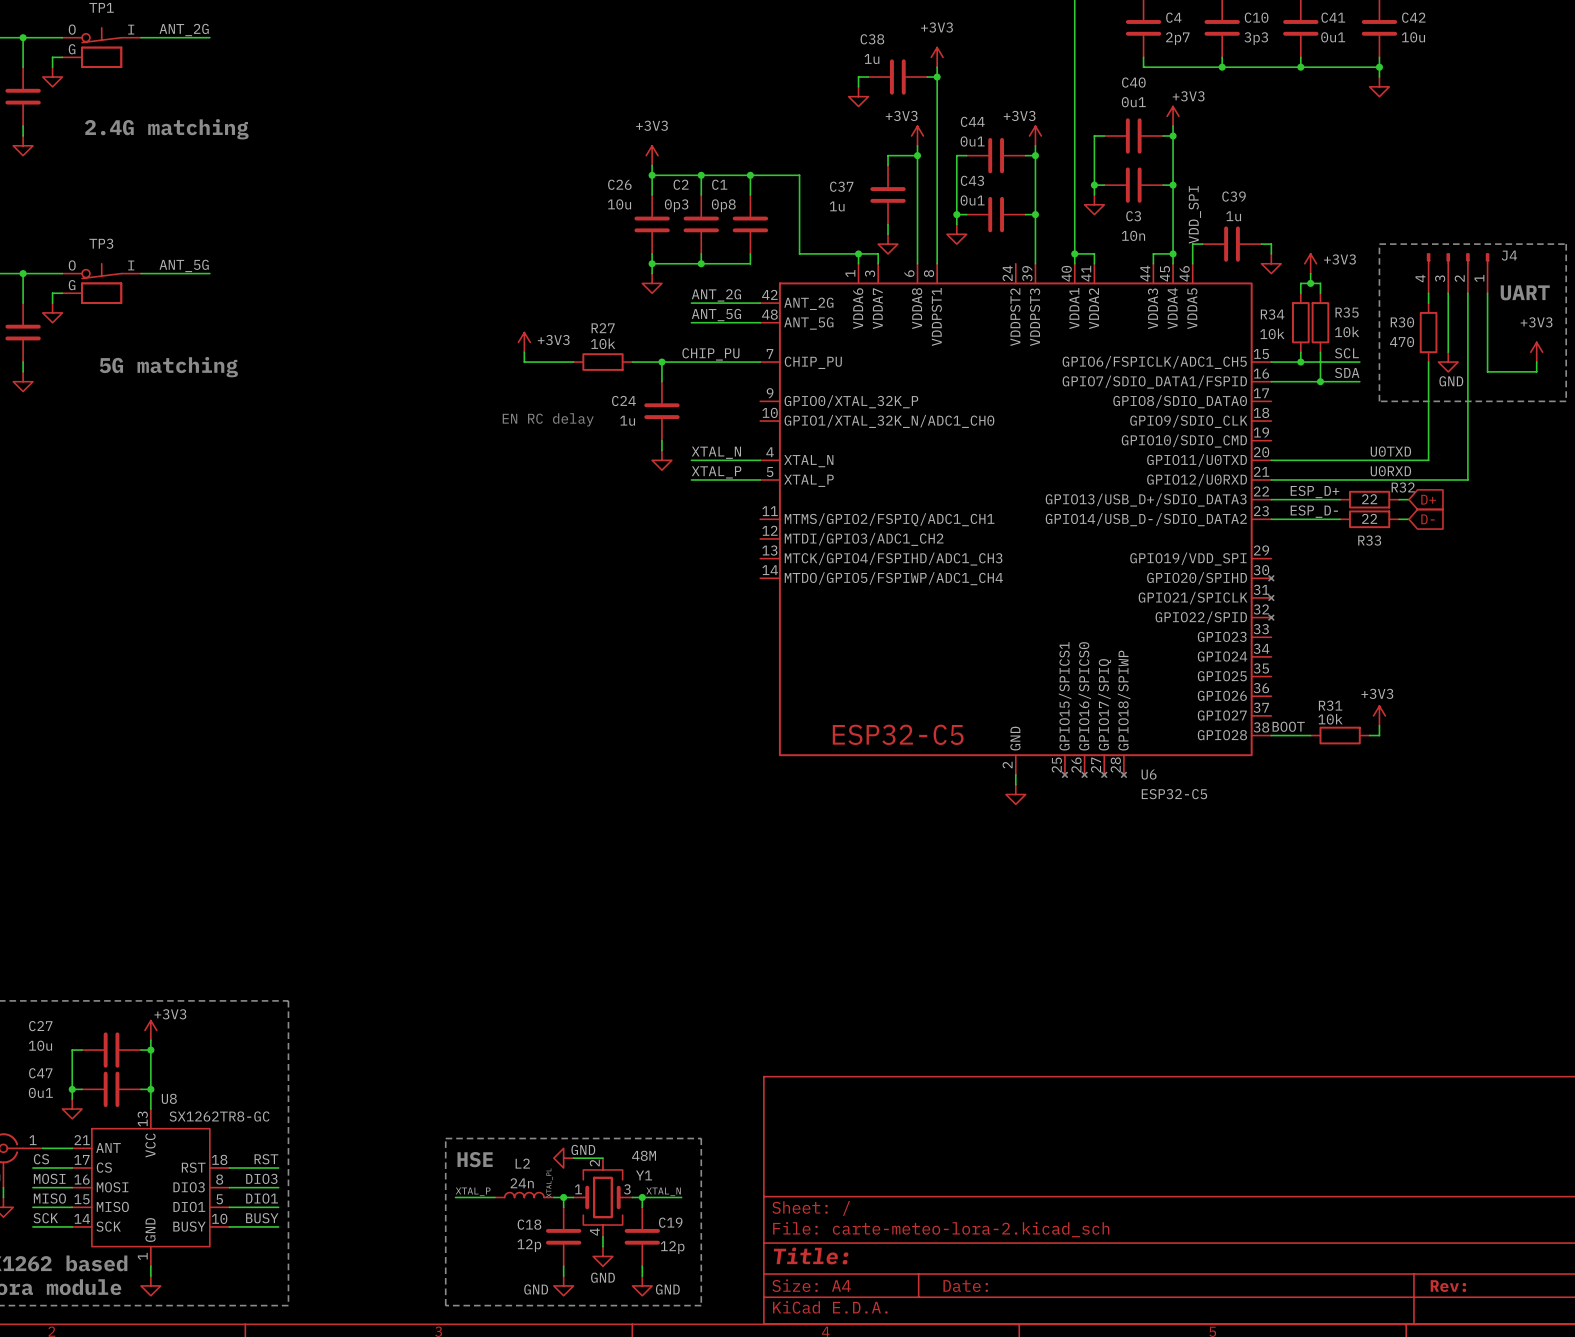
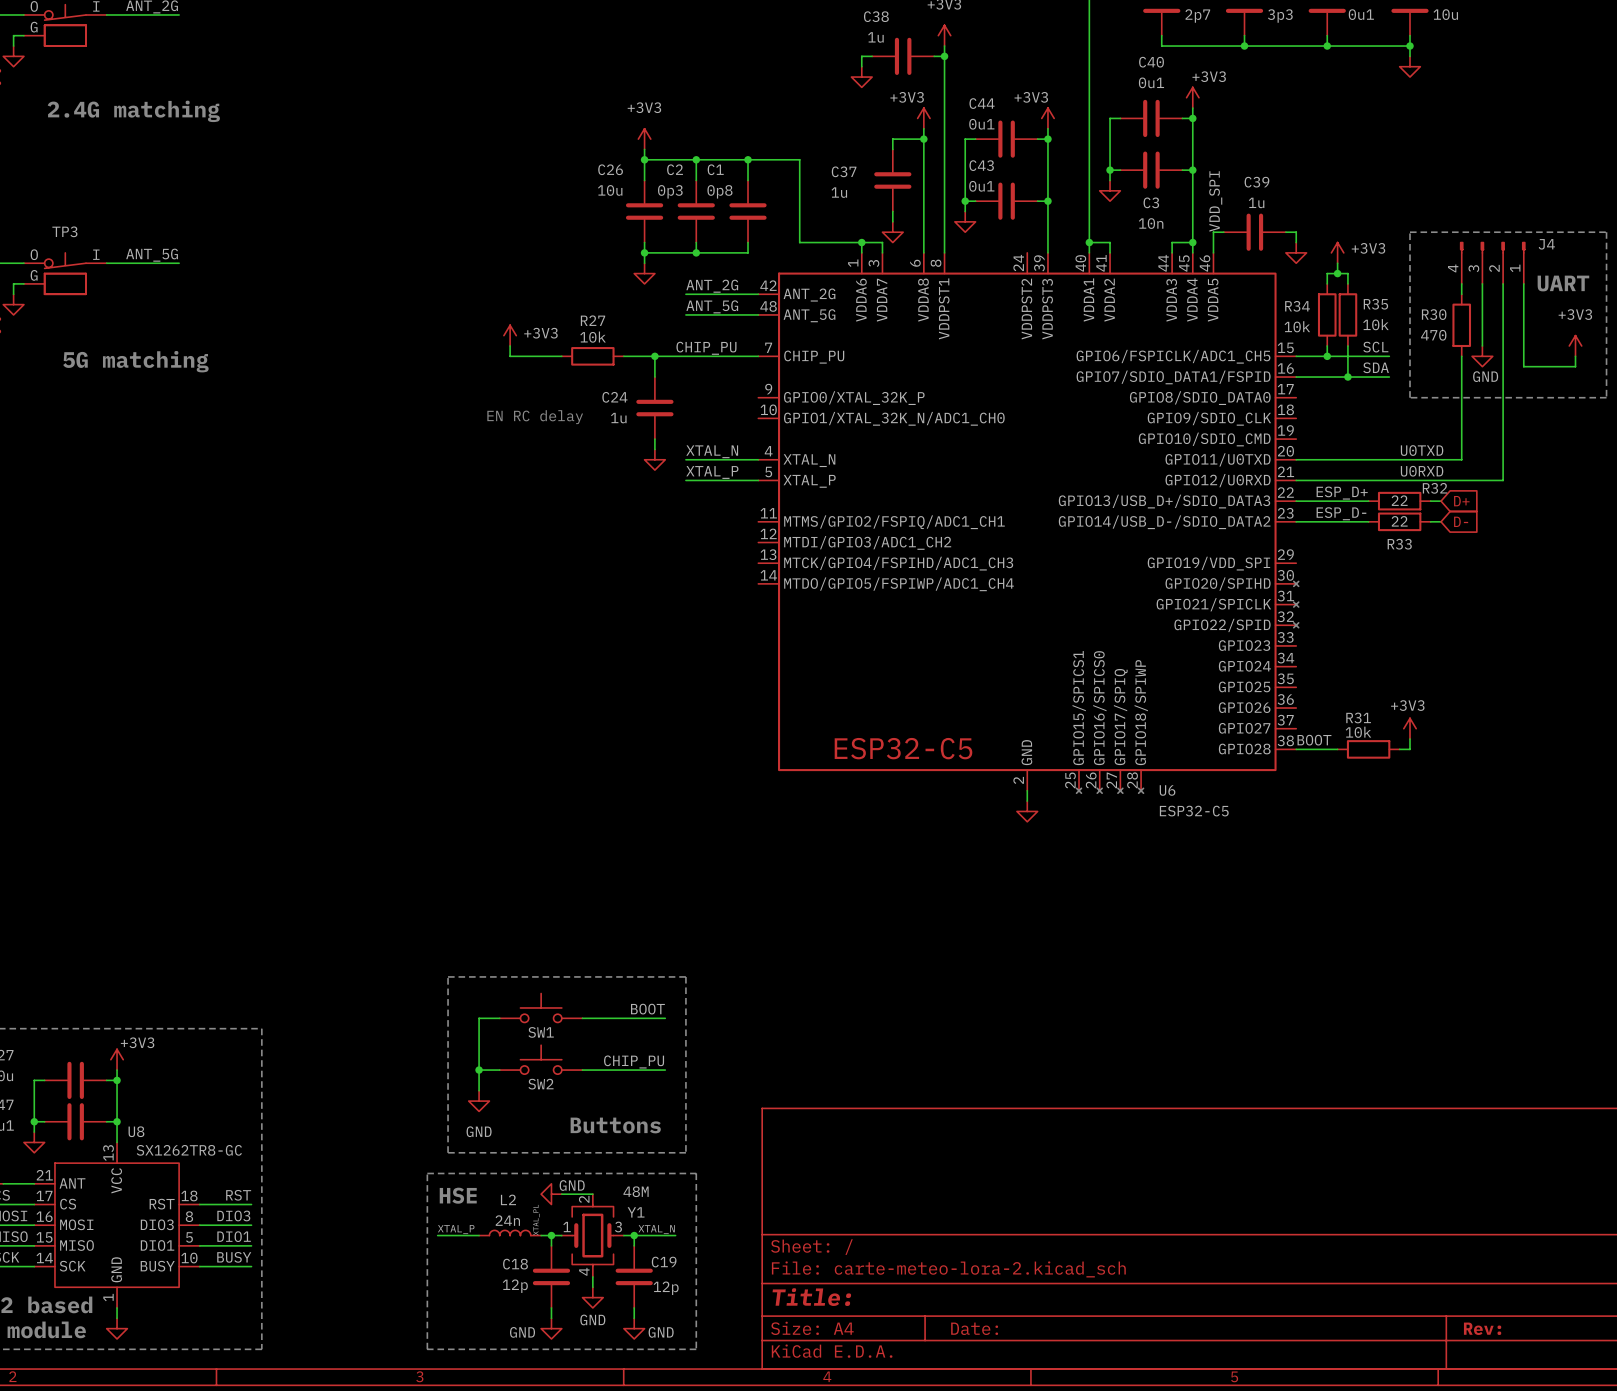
line: none -> (448, 976) (685, 976) (685, 1152) (448, 1152) (448, 976)
SW1: none -> (541, 1007)
label: none -> BOOT (647, 1009)
wire: none -> (499, 1018) (479, 1018) (479, 1090)
wire: none -> (582, 1018) (665, 1018)
SW2: none -> (541, 1059)
label: none -> CHIP_PU (634, 1061)
wire: none -> (479, 1070) (499, 1070)
junction: none -> (479, 1070)
wire: none -> (582, 1070) (665, 1070)
power symbol: none -> GND (479, 1101)
text: none -> Buttons (615, 1125)

